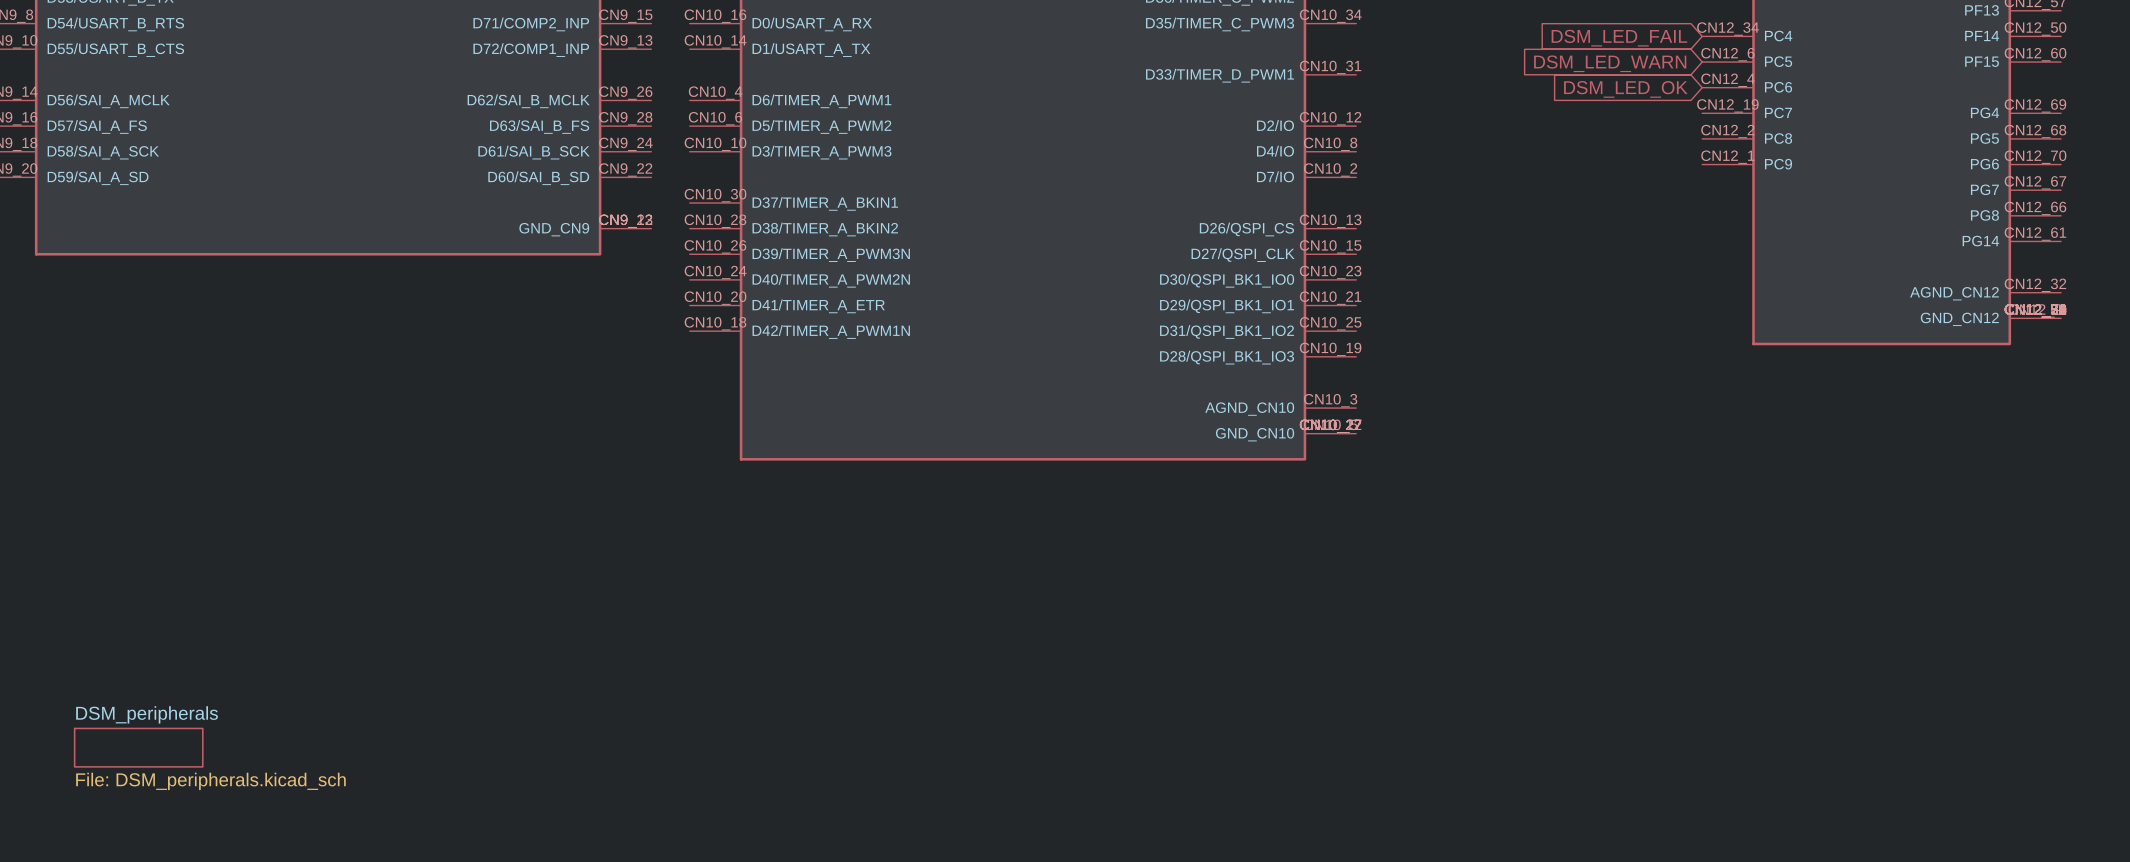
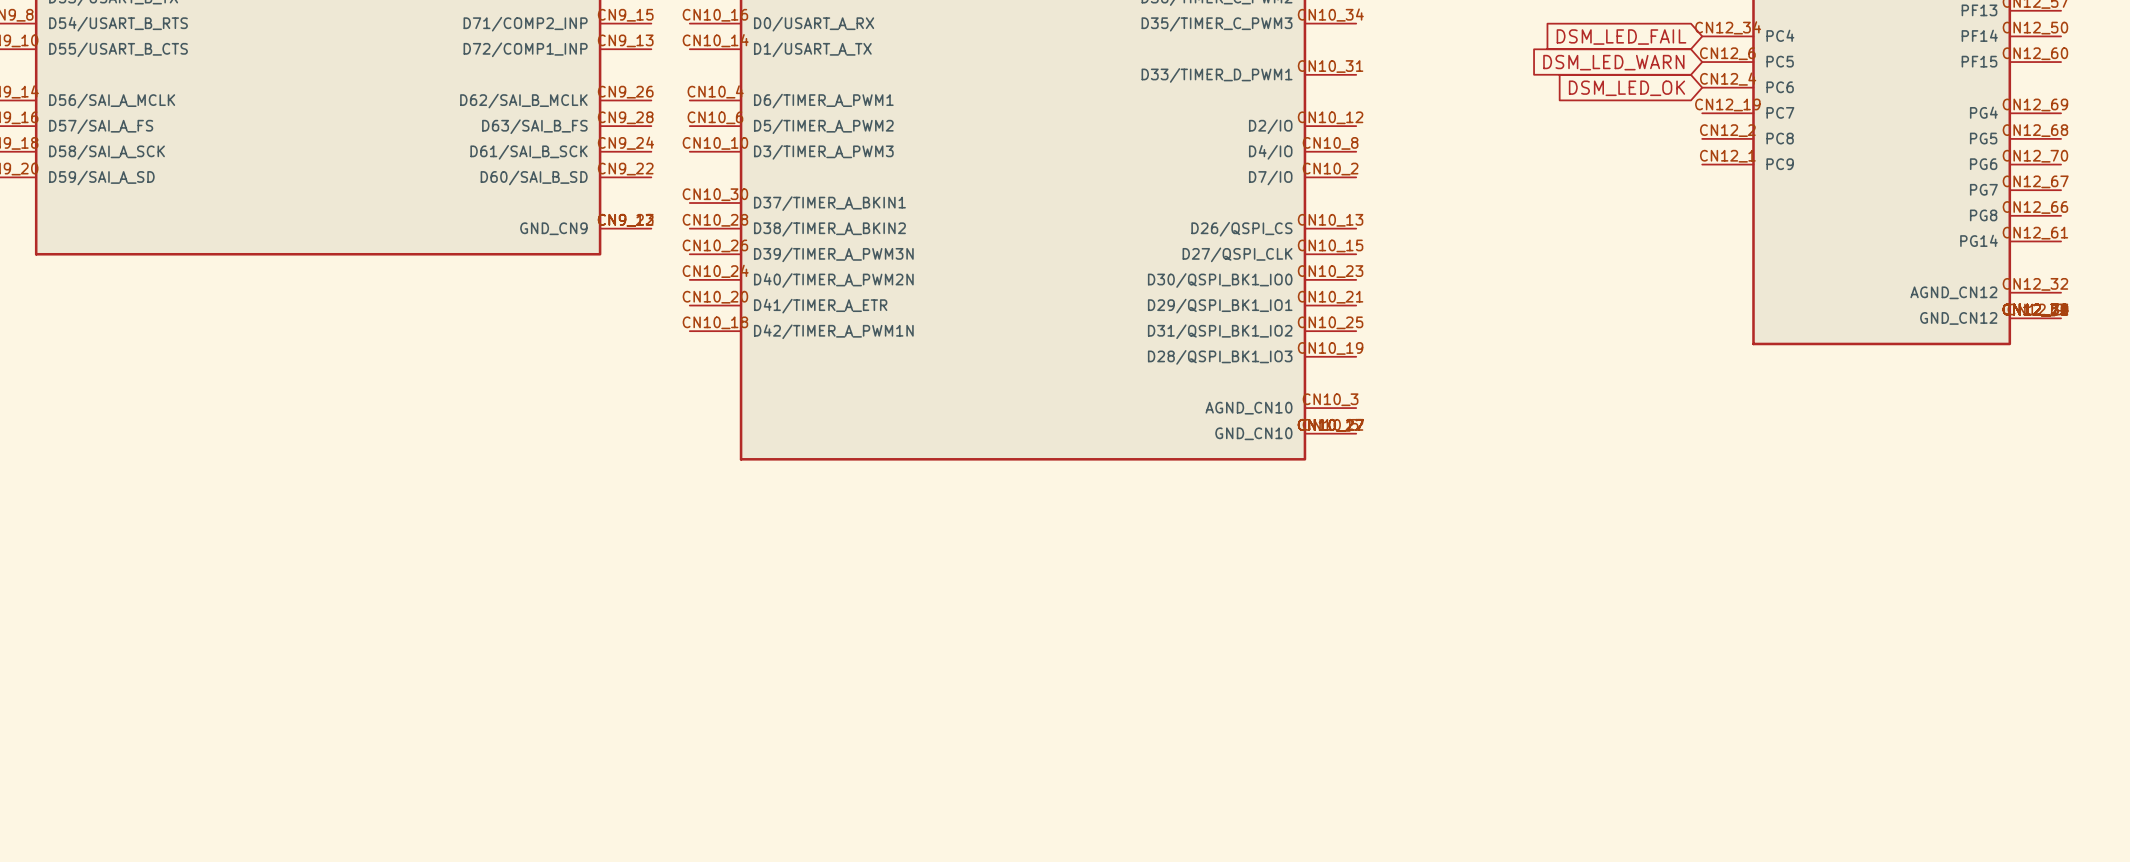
sheet DSM_peripherals: File: DSM_peripherals.kicad_sch (138, 747) -> none

